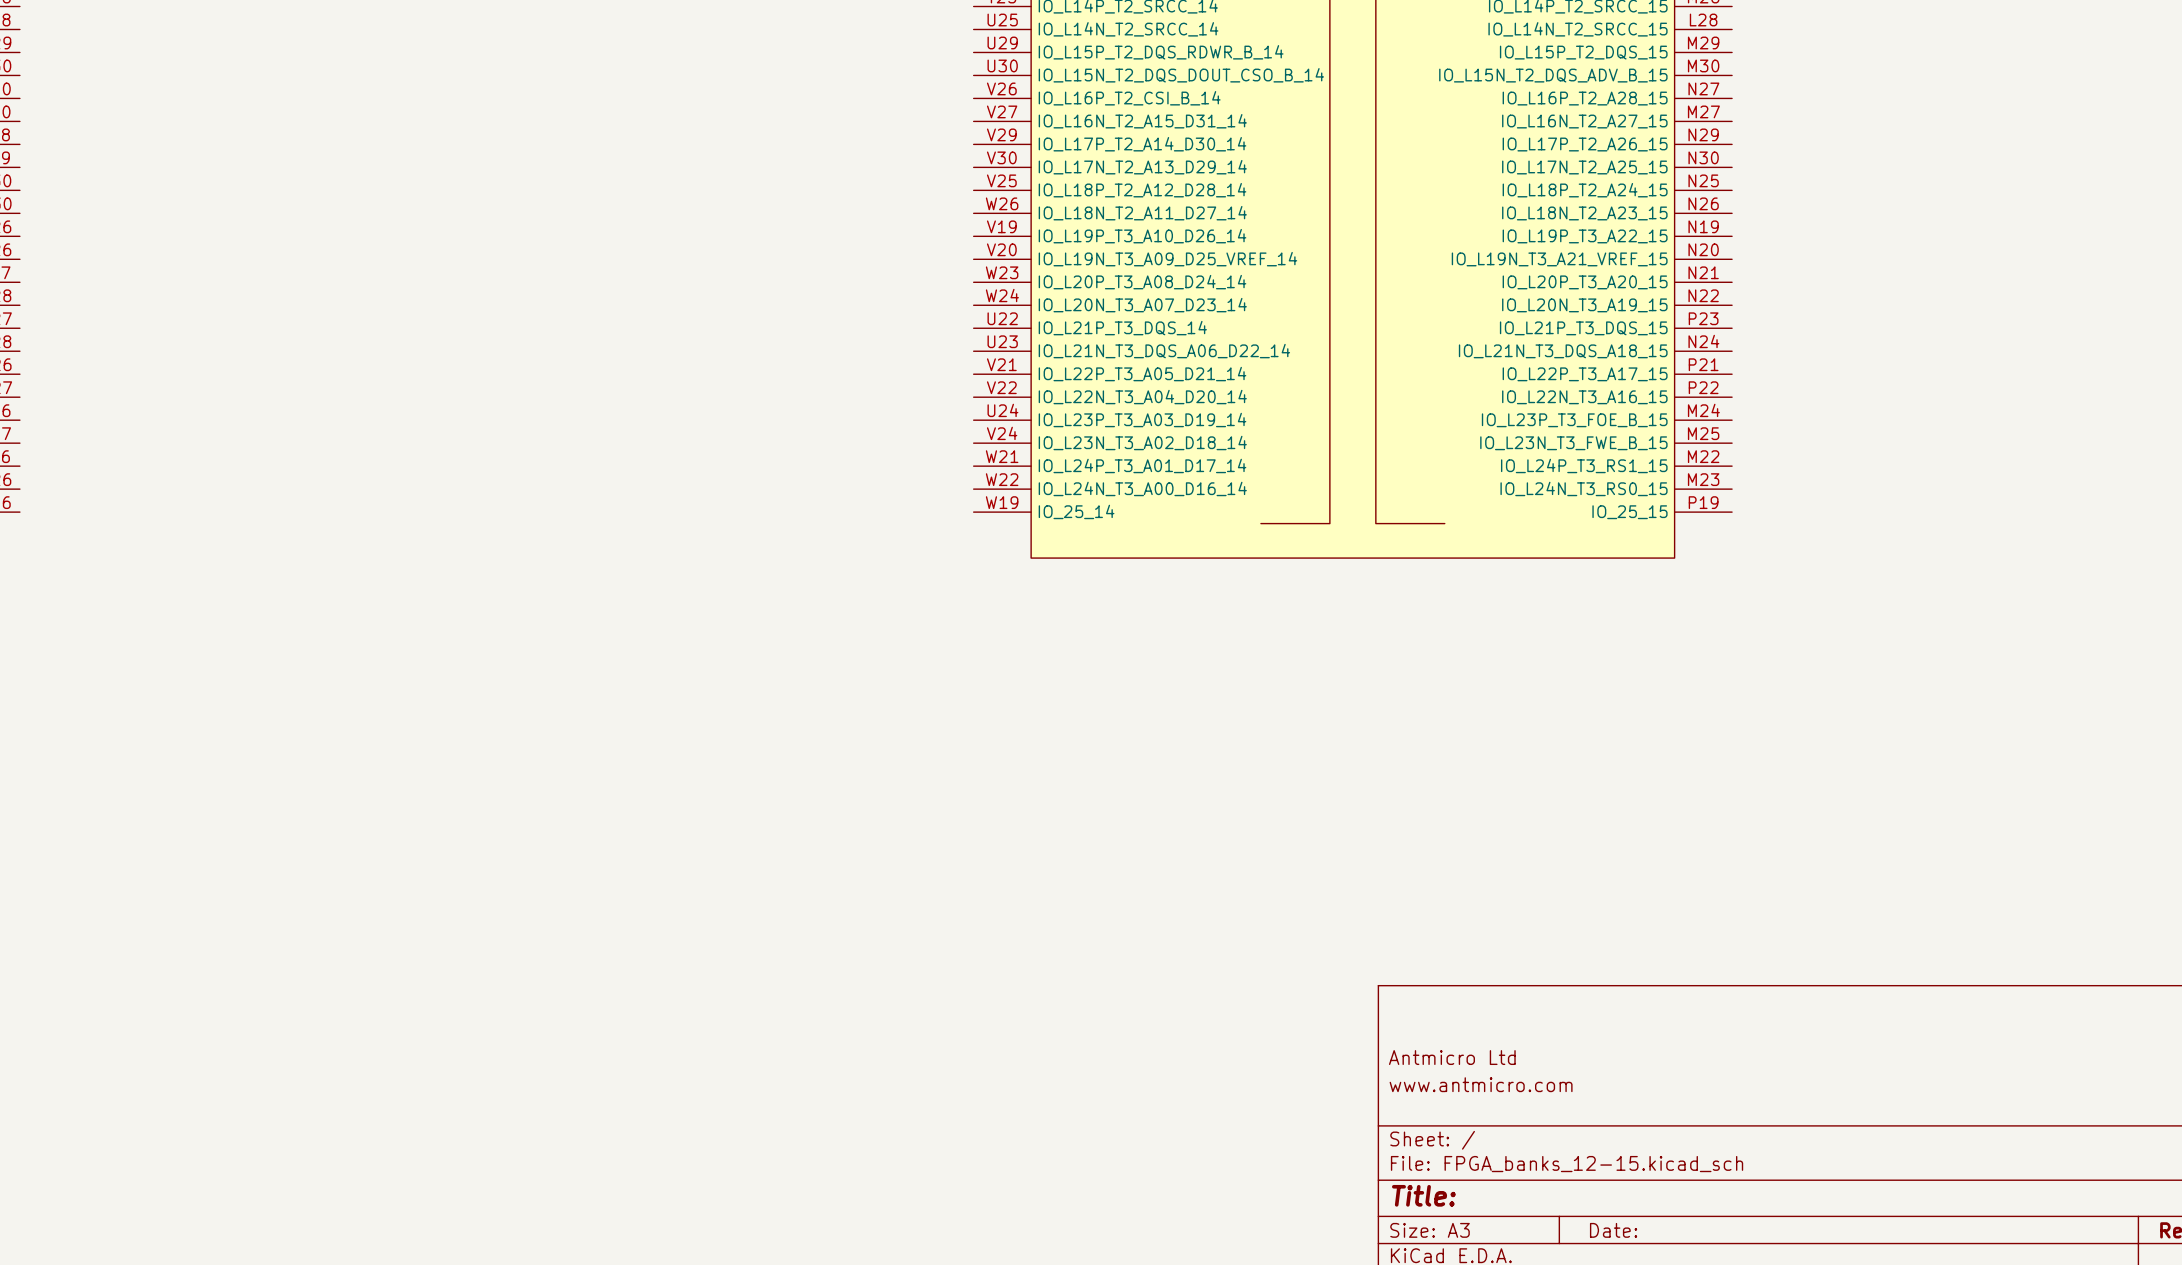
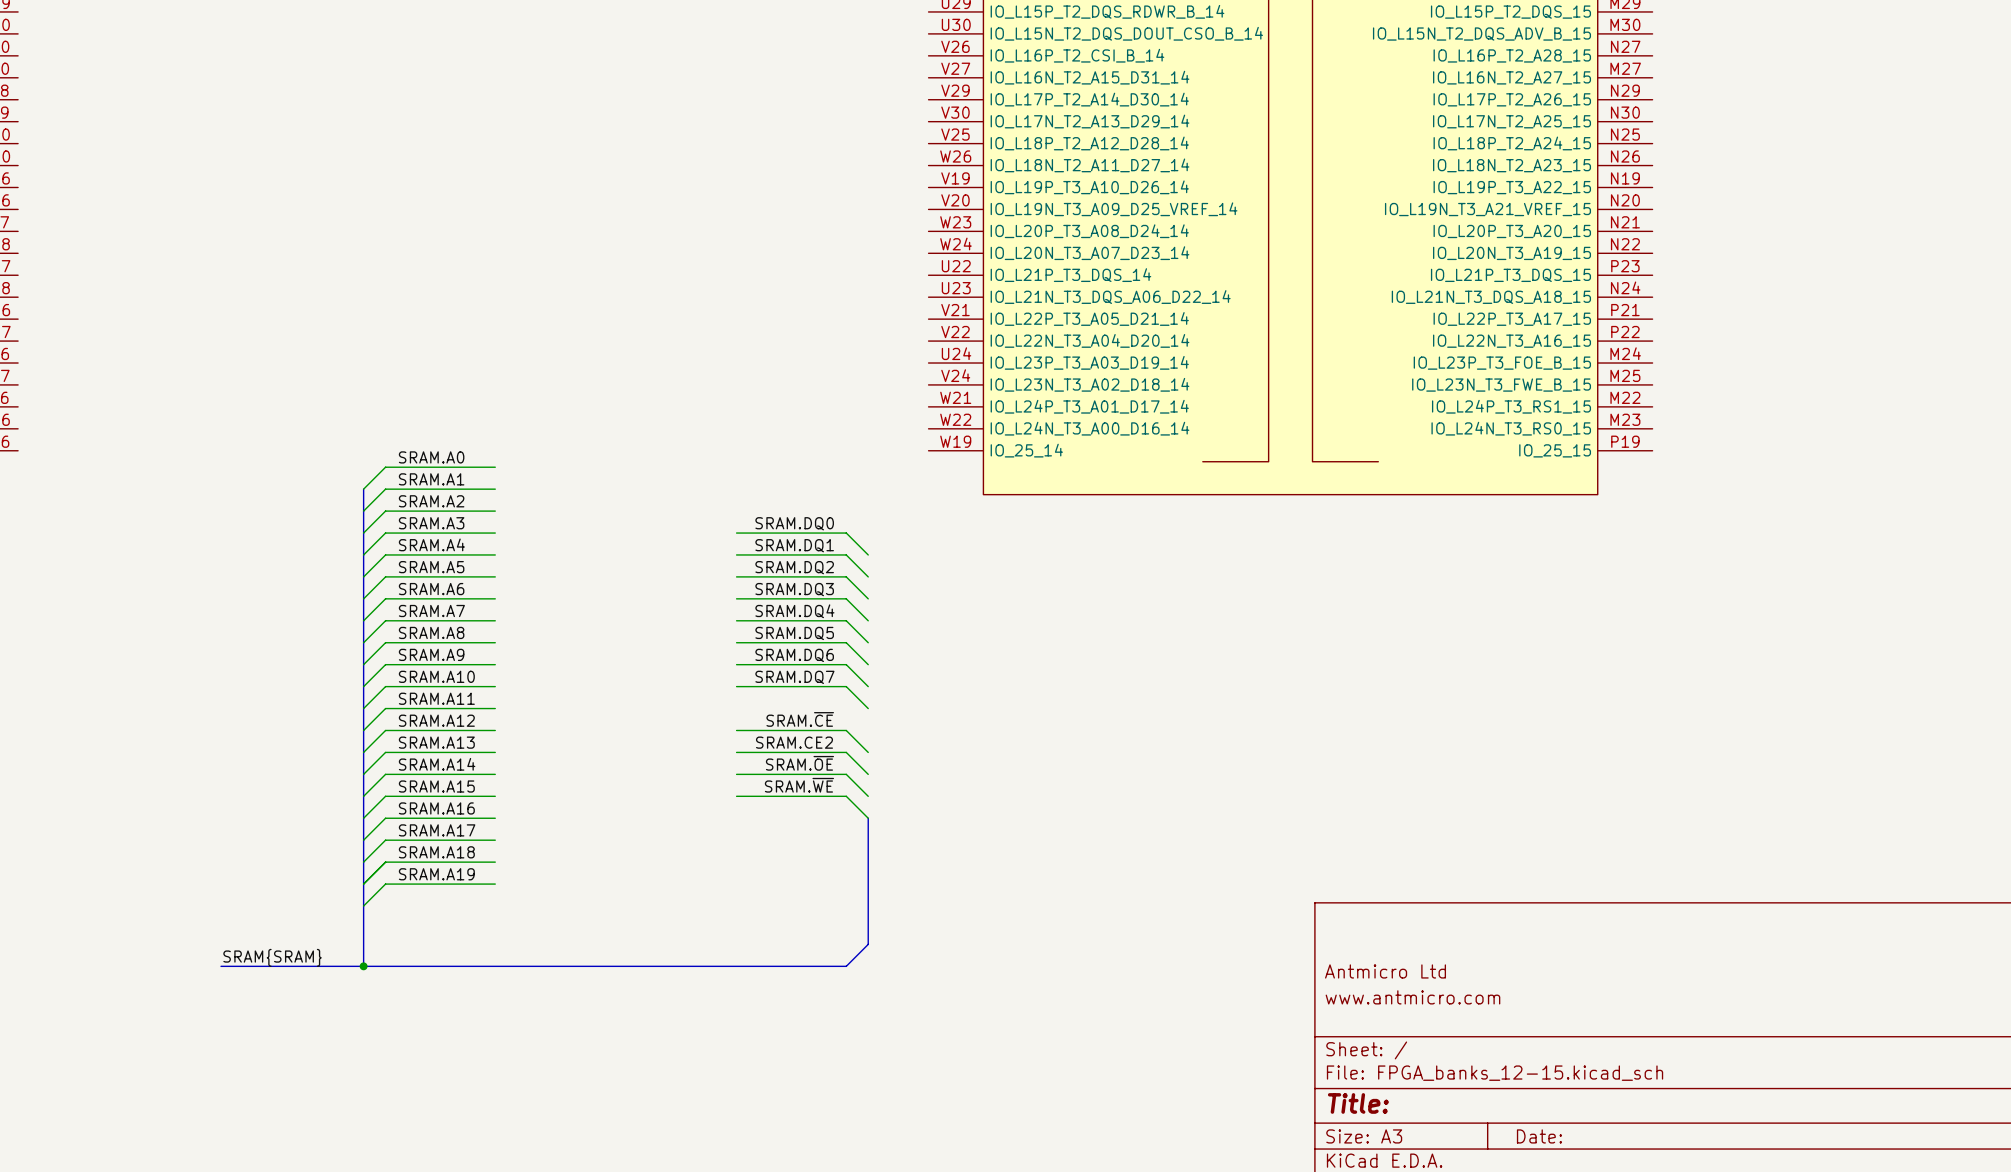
label: none -> SRAM.A0 (431, 457)
wire: none -> (495, 467) (385, 467) (363, 489)
label: none -> SRAM.A1 (431, 479)
bus: none -> (363, 489) (363, 966)
wire: none -> (385, 489) (495, 489)
wire: none -> (385, 489) (363, 511)
label: none -> SRAM.A2 (431, 501)
wire: none -> (495, 511) (385, 511) (363, 533)
label: none -> SRAM.A3 (431, 523)
label: none -> SRAM.DQ0 (794, 523)
wire: none -> (495, 533) (385, 533) (363, 554)
wire: none -> (736, 533) (846, 533) (868, 554)
label: none -> SRAM.A4 (431, 544)
label: none -> SRAM.DQ1 (794, 545)
wire: none -> (495, 554) (385, 554) (363, 576)
wire: none -> (736, 554) (846, 554) (868, 576)
label: none -> SRAM.A5 (431, 567)
label: none -> SRAM.DQ2 (794, 567)
wire: none -> (385, 576) (495, 576)
wire: none -> (385, 576) (363, 598)
wire: none -> (736, 576) (846, 576)
wire: none -> (846, 576) (868, 598)
label: none -> SRAM.A6 (431, 589)
label: none -> SRAM.DQ3 (794, 589)
wire: none -> (495, 598) (385, 598) (363, 620)
wire: none -> (736, 598) (846, 598) (868, 620)
label: none -> SRAM.A7 (431, 611)
label: none -> SRAM.DQ4 (794, 611)
wire: none -> (495, 620) (385, 620) (363, 642)
wire: none -> (736, 620) (846, 620) (868, 642)
label: none -> SRAM.A8 (431, 632)
label: none -> SRAM.DQ5 (794, 633)
wire: none -> (385, 642) (495, 642)
wire: none -> (385, 642) (363, 664)
wire: none -> (736, 642) (846, 642)
wire: none -> (846, 642) (868, 664)
label: none -> SRAM.A9 (431, 654)
label: none -> SRAM.DQ6 (794, 655)
wire: none -> (495, 664) (385, 664) (363, 686)
wire: none -> (736, 664) (846, 664) (868, 686)
label: none -> SRAM.A10 (436, 676)
label: none -> SRAM.DQ7 (794, 677)
wire: none -> (495, 686) (385, 686) (363, 708)
wire: none -> (736, 686) (846, 686) (868, 708)
label: none -> SRAM.A11 (436, 698)
wire: none -> (495, 708) (385, 708) (363, 730)
label: none -> SRAM.~{CE} (800, 719)
label: none -> SRAM.A12 (436, 720)
wire: none -> (385, 730) (495, 730)
wire: none -> (385, 730) (363, 752)
wire: none -> (736, 730) (846, 730)
wire: none -> (846, 730) (868, 752)
label: none -> SRAM.A13 (436, 742)
label: none -> SRAM.CE2 (794, 742)
wire: none -> (495, 752) (385, 752) (363, 774)
wire: none -> (736, 752) (846, 752) (868, 774)
label: none -> SRAM.~{OE} (799, 763)
label: none -> SRAM.A14 (437, 764)
wire: none -> (495, 774) (385, 774) (363, 796)
wire: none -> (736, 774) (846, 774) (868, 796)
label: none -> SRAM.~{WE} (799, 785)
label: none -> SRAM.A15 (436, 786)
wire: none -> (385, 796) (495, 796)
wire: none -> (385, 796) (363, 818)
wire: none -> (736, 796) (846, 796)
wire: none -> (846, 796) (868, 818)
label: none -> SRAM.A16 (436, 808)
wire: none -> (495, 818) (385, 818) (363, 840)
bus: none -> (868, 818) (868, 944) (846, 966) (221, 966)
label: none -> SRAM.A17 (437, 830)
wire: none -> (495, 840) (385, 840) (363, 862)
label: none -> SRAM.A18 (436, 852)
wire: none -> (495, 862) (385, 862) (363, 884)
label: none -> SRAM.A19 (436, 874)
wire: none -> (385, 884) (495, 884)
wire: none -> (385, 884) (363, 906)
label: none -> SRAM{SRAM} (272, 957)
junction: none -> (363, 966)

